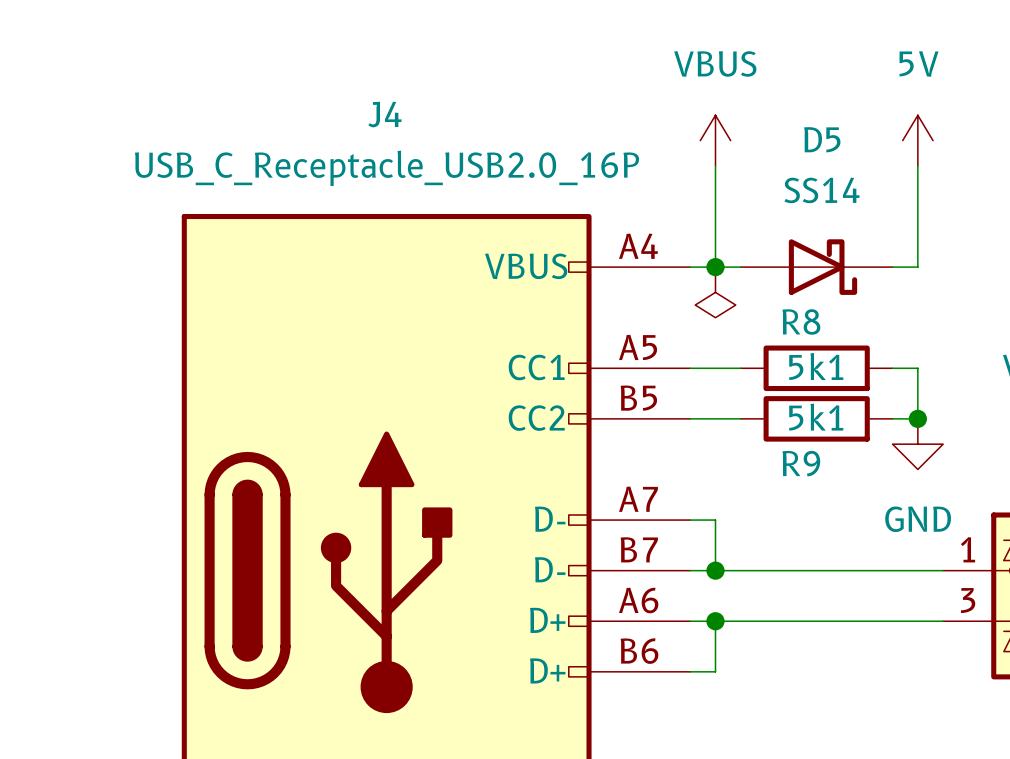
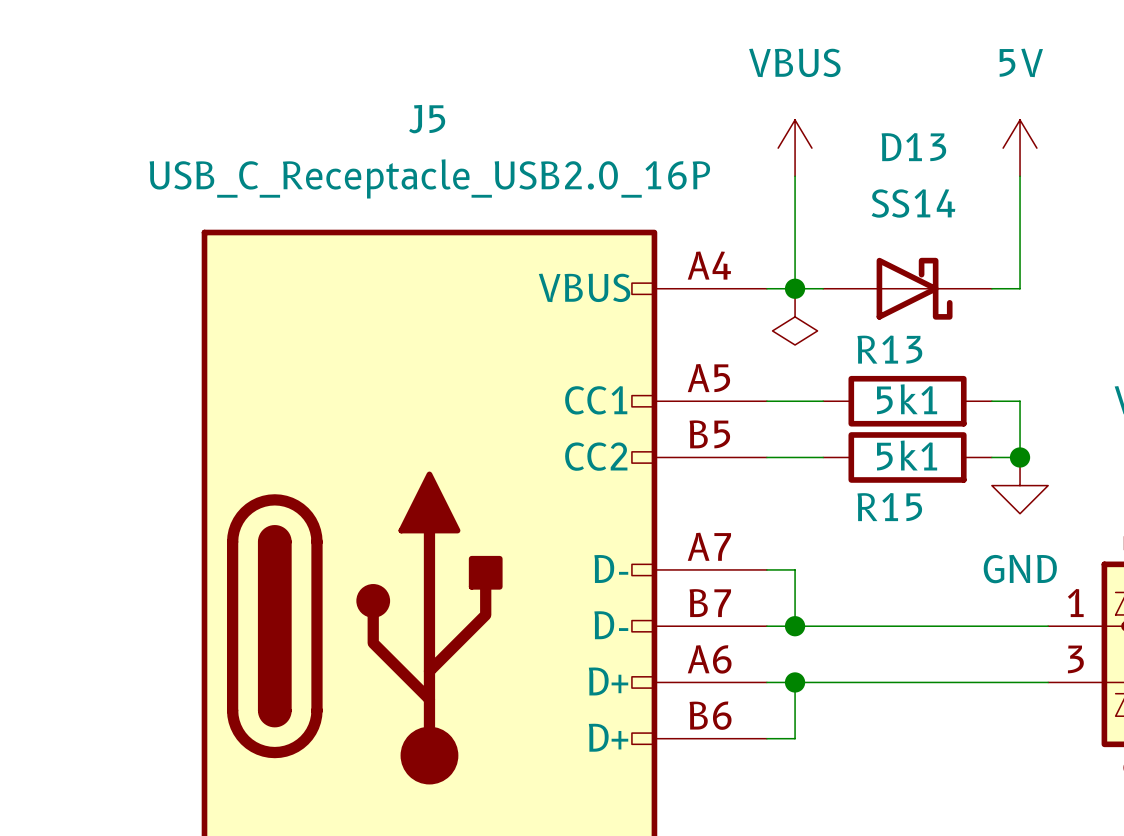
J4 name: J4 (385, 114) -> J5 (427, 119)
D5 name: D5 (822, 139) -> D13 (913, 147)
R8 name: R8 (801, 321) -> R13 (889, 349)
R9 name: R9 (801, 463) -> R15 (889, 507)

